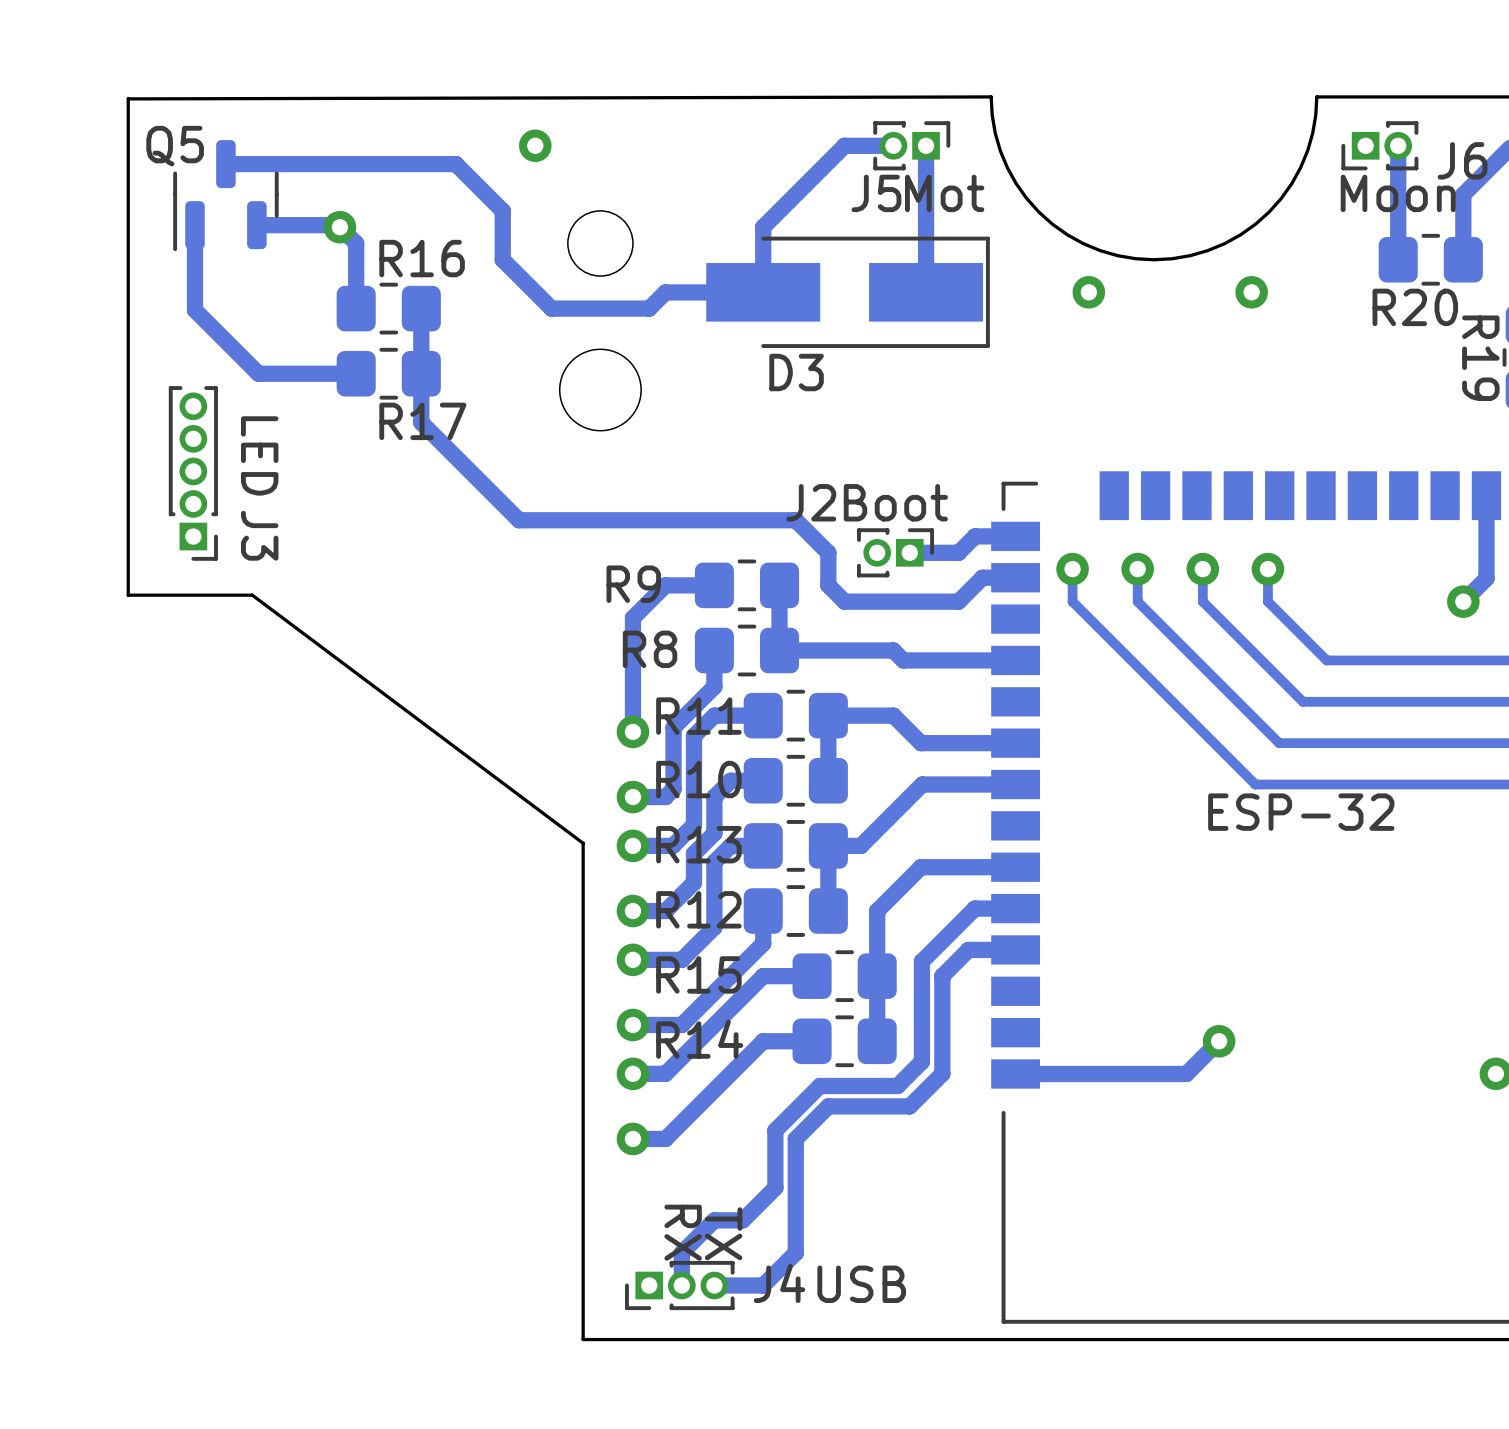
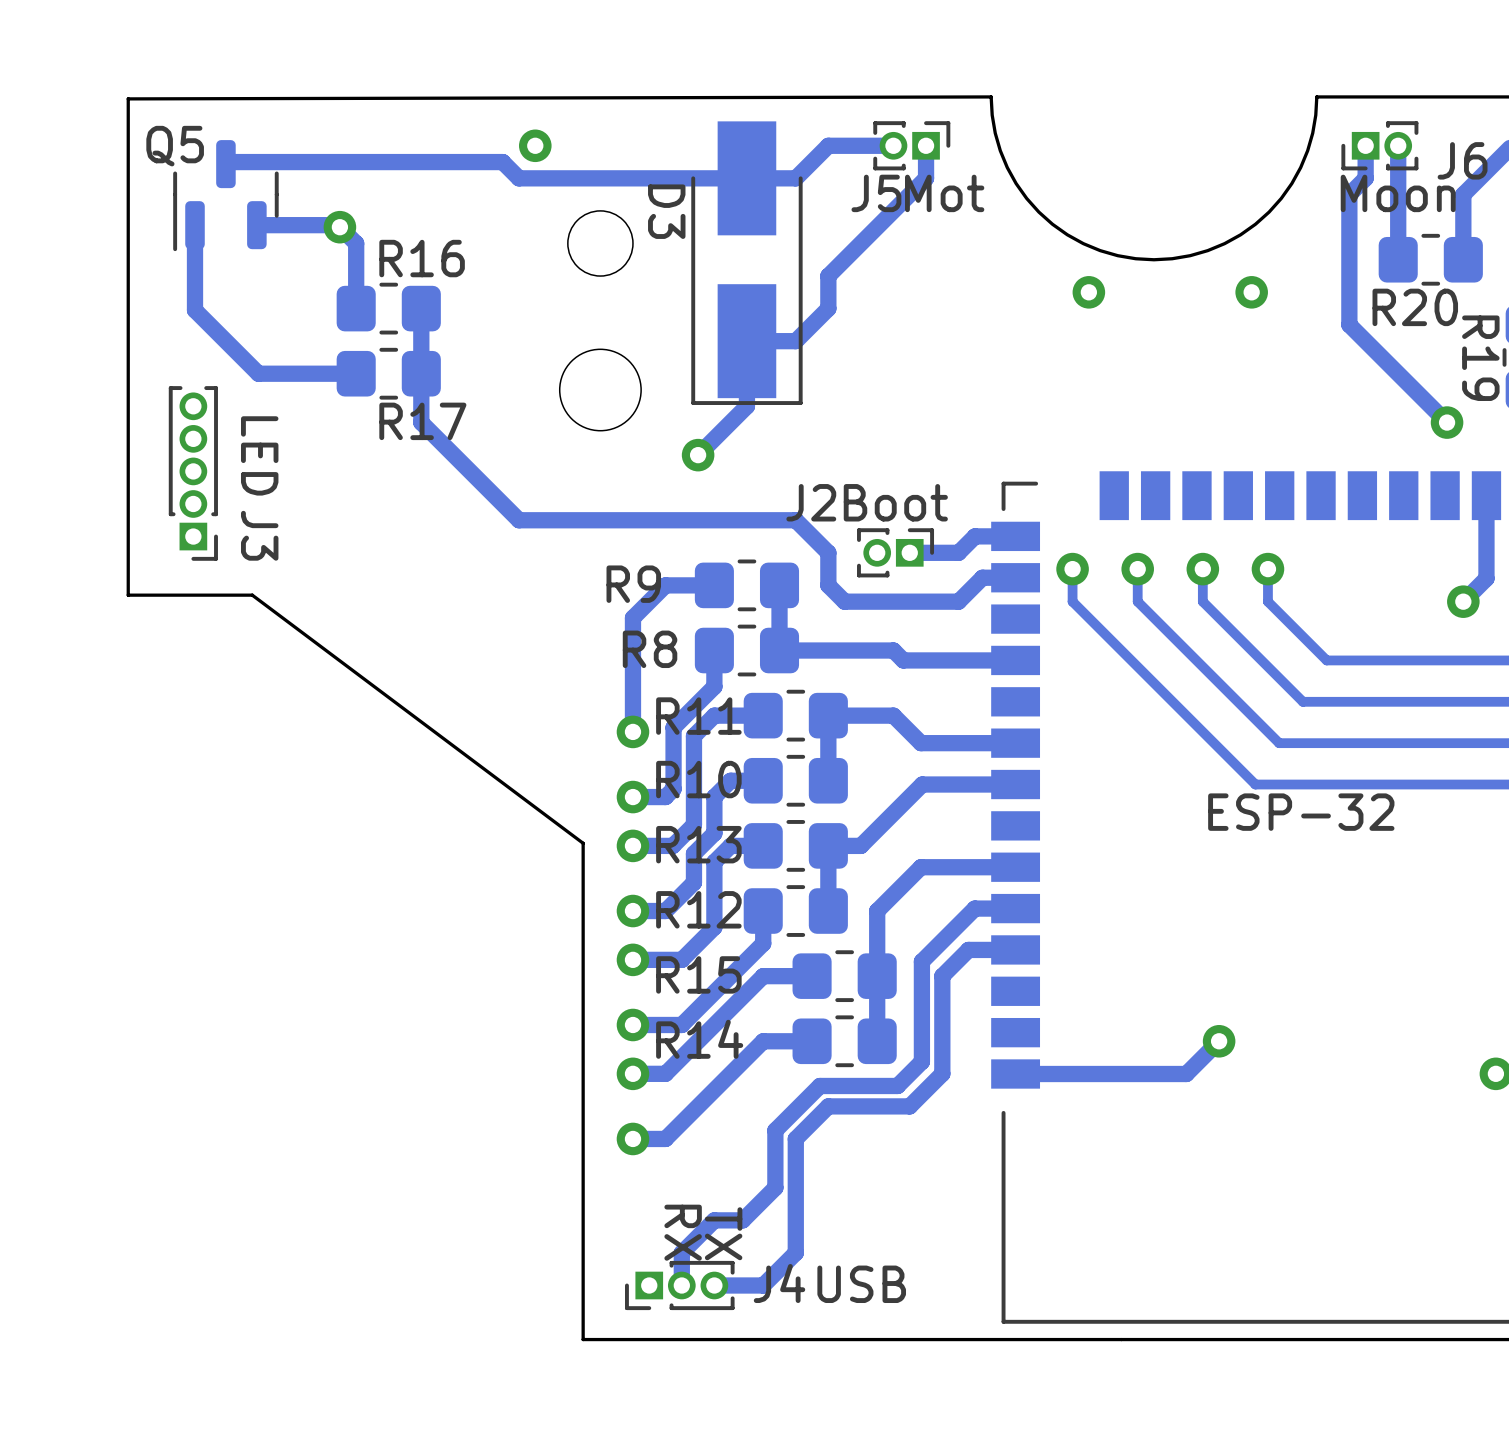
track: (844, 145) (763, 227) (763, 292) (665, 292) (649, 308) (551, 308) (502, 259) (502, 210) (455, 164) (225, 164) -> (844, 145) (828, 145) (795, 178) (519, 178) (502, 162) (227, 162)
track: none -> (1365, 145) (1365, 178) (1349, 194) (1349, 324) (1447, 422)
track: (926, 178) (926, 292) -> (926, 178) (828, 276) (828, 308) (795, 341) (746, 341) (746, 406) (698, 455)
D3 rotation: 0° (848, 292) -> 90° clockwise (746, 263)
via: none -> (1447, 422)
via: none -> (698, 455)

